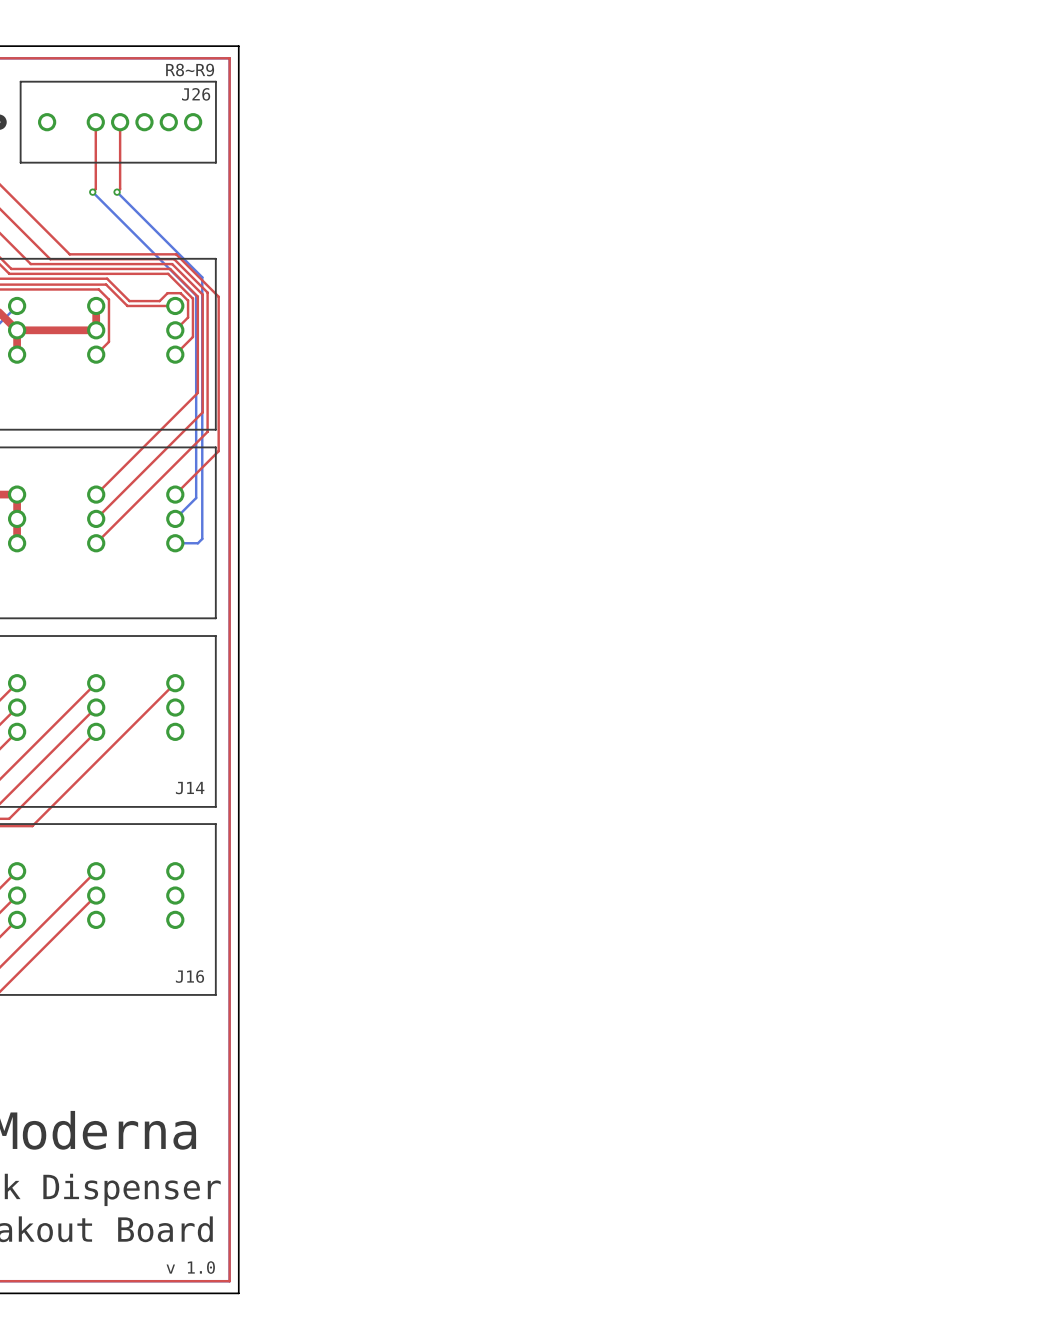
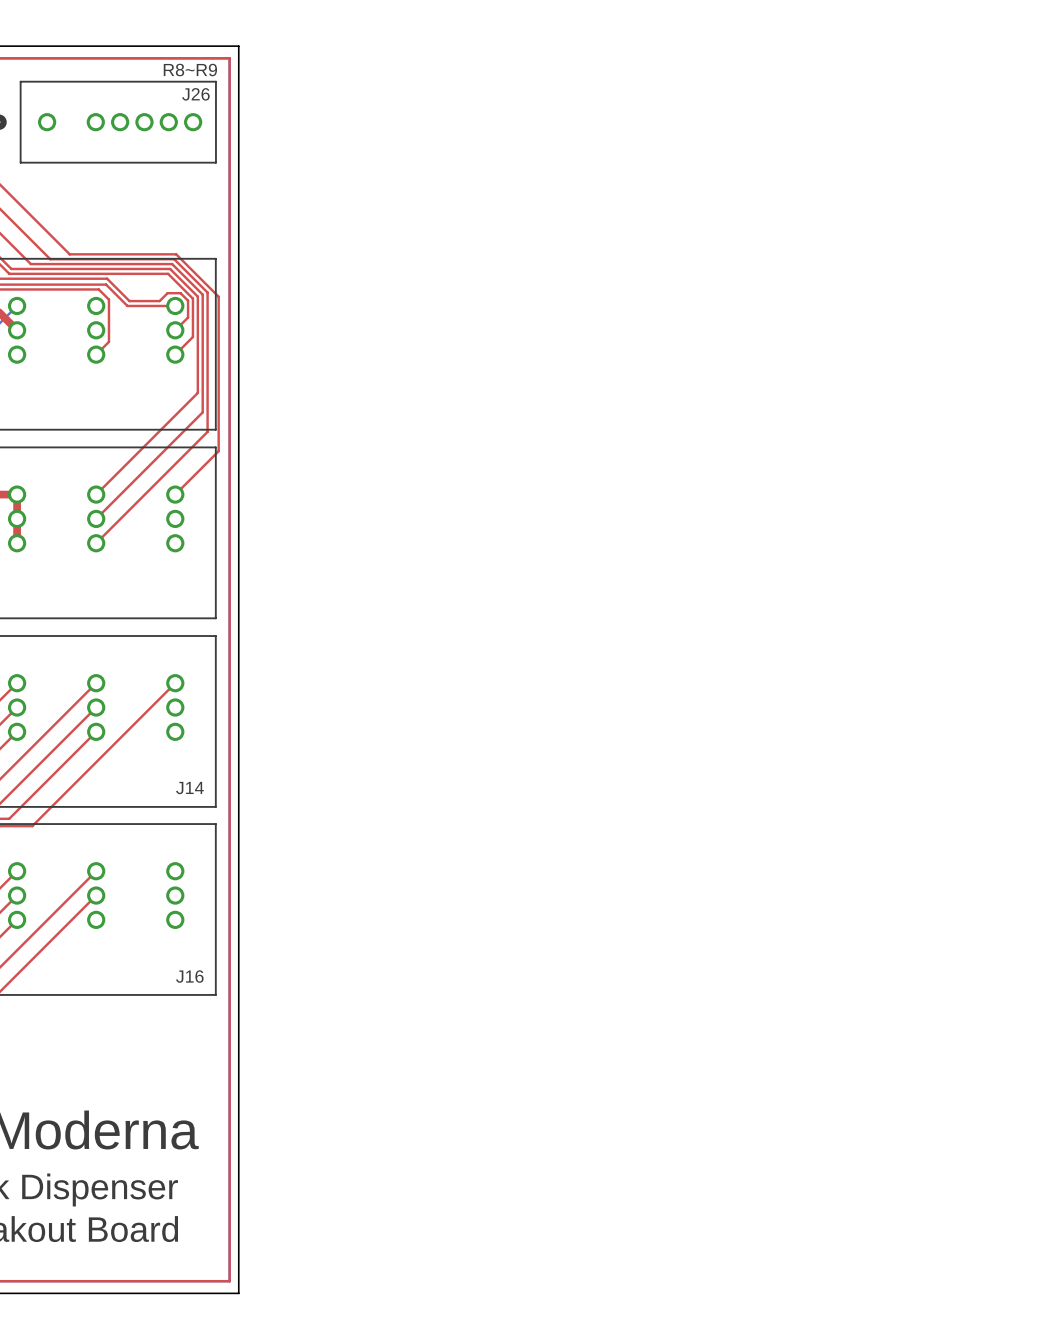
top track: (95, 122) (95, 189) (92, 192) -> none
top track: (120, 122) (120, 189) (117, 192) -> none
bottom track: (92, 192) (196, 295) (196, 498) (175, 518) -> none
via: (92, 192) -> none
bottom track: (117, 192) (202, 277) (202, 538) (197, 543) (175, 543) -> none
via: (117, 192) -> none
top track: (96, 305) (96, 330) (17, 330) (17, 354) -> none
text: v 1.0 (190, 1267) -> none

